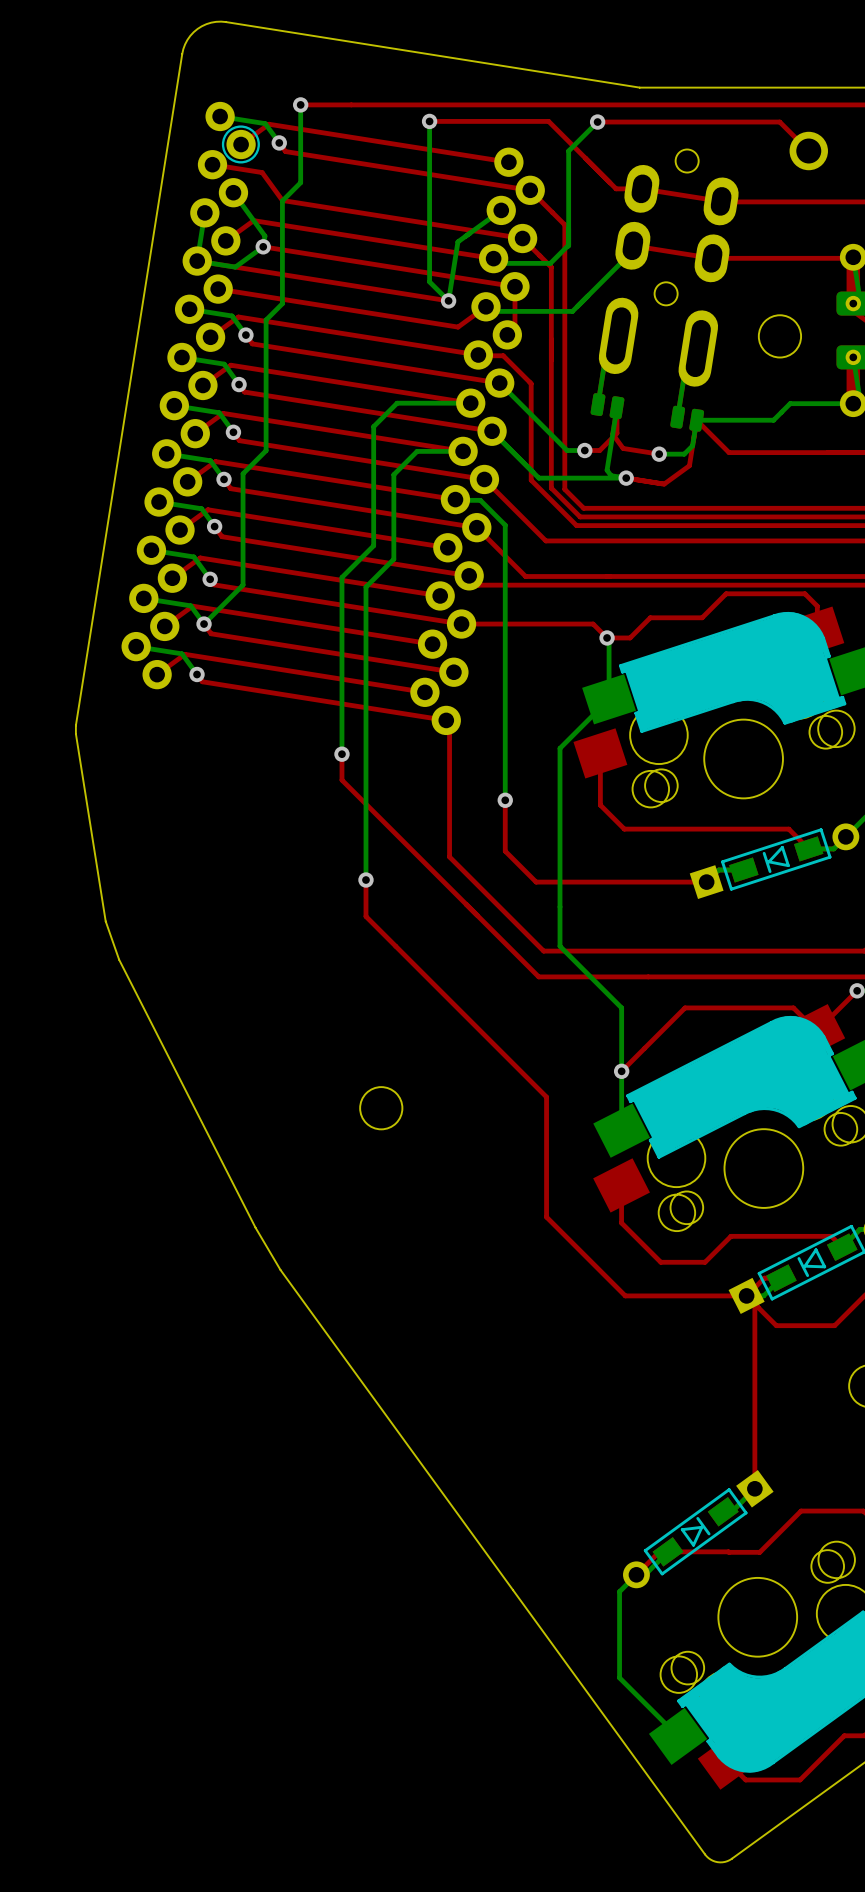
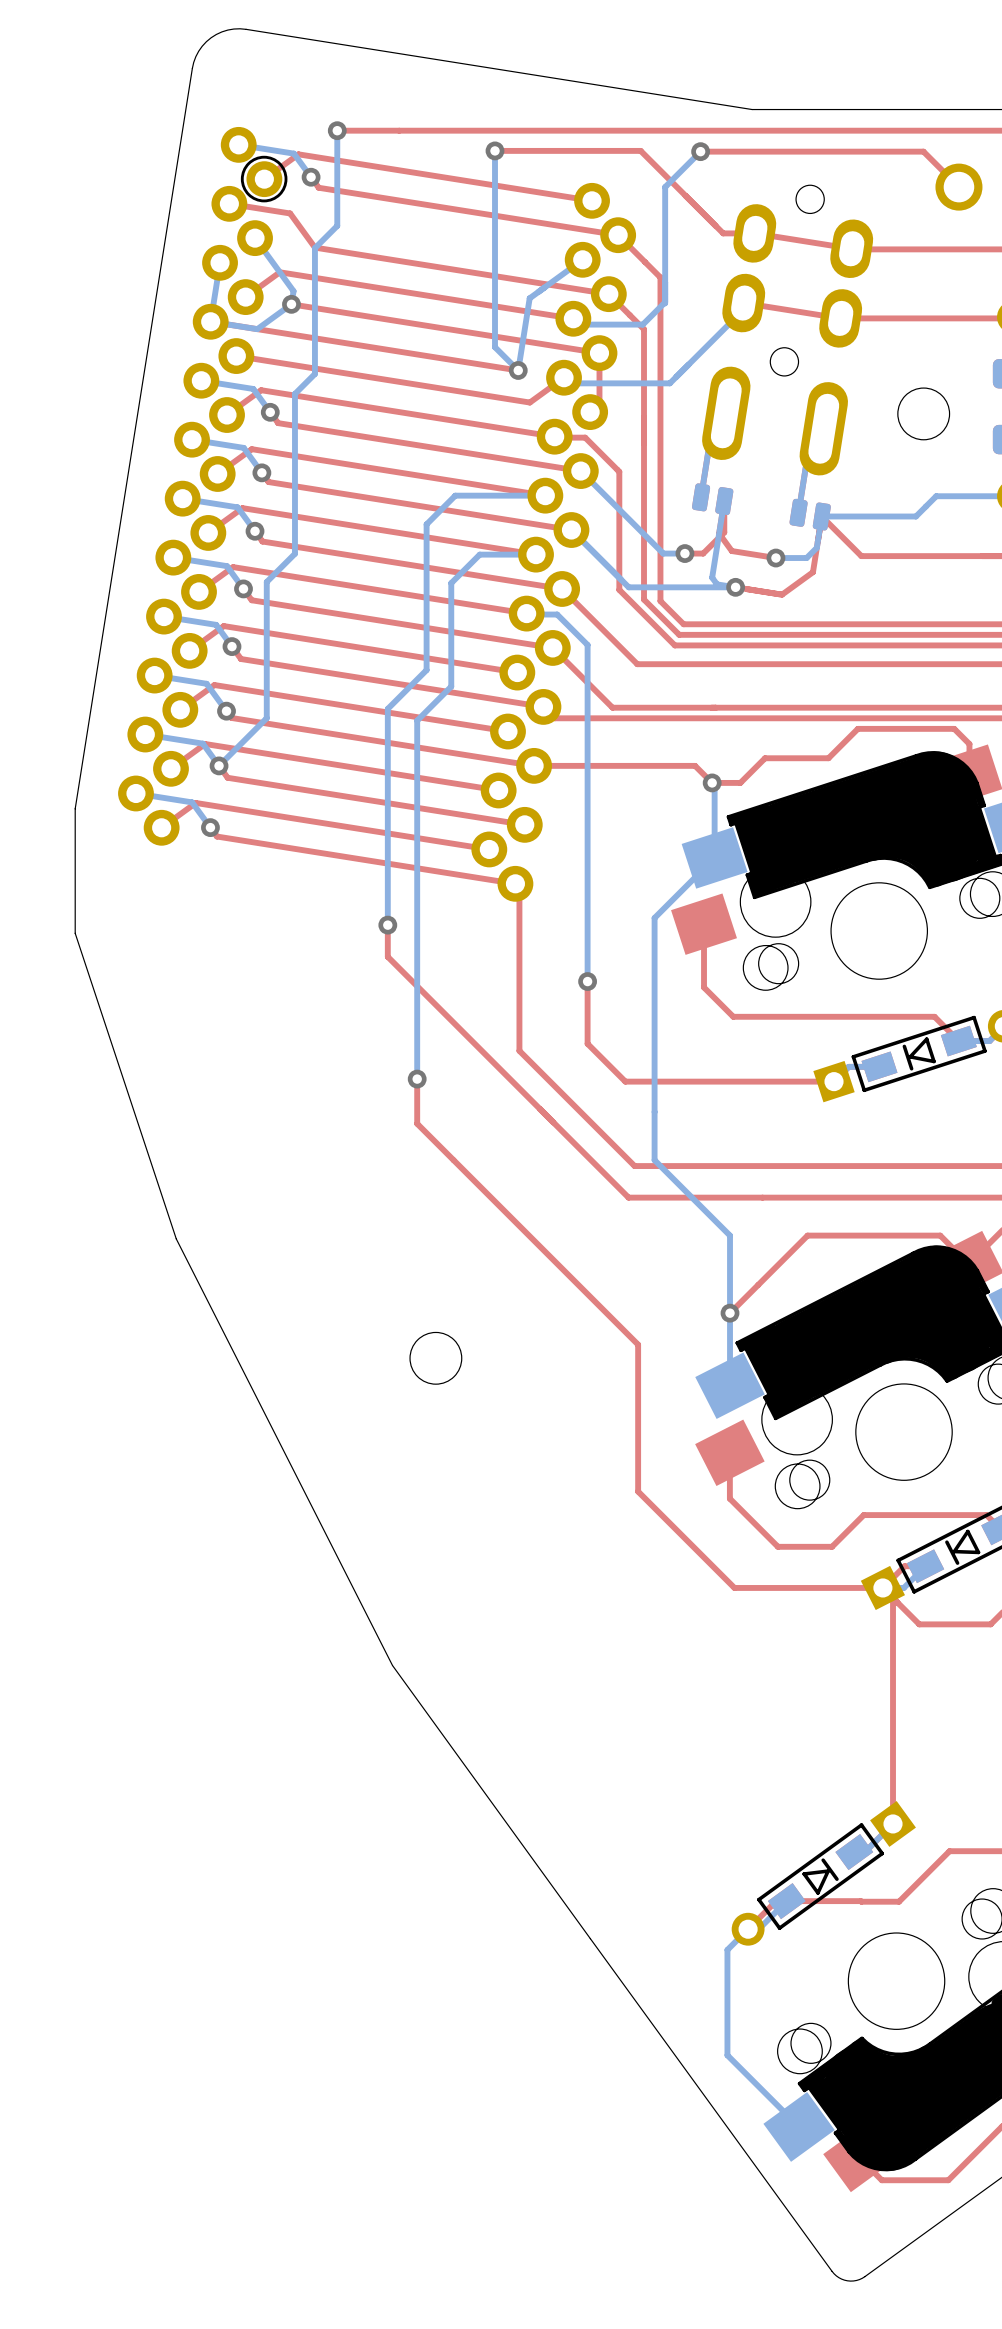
board edge: (182, 54) (75, 725) (105, 921) (119, 959) (255, 1227) (280, 1269) (705, 1854) -> (192, 68) (75, 808) (75, 933) (176, 1238) (392, 1665) (832, 2271)

